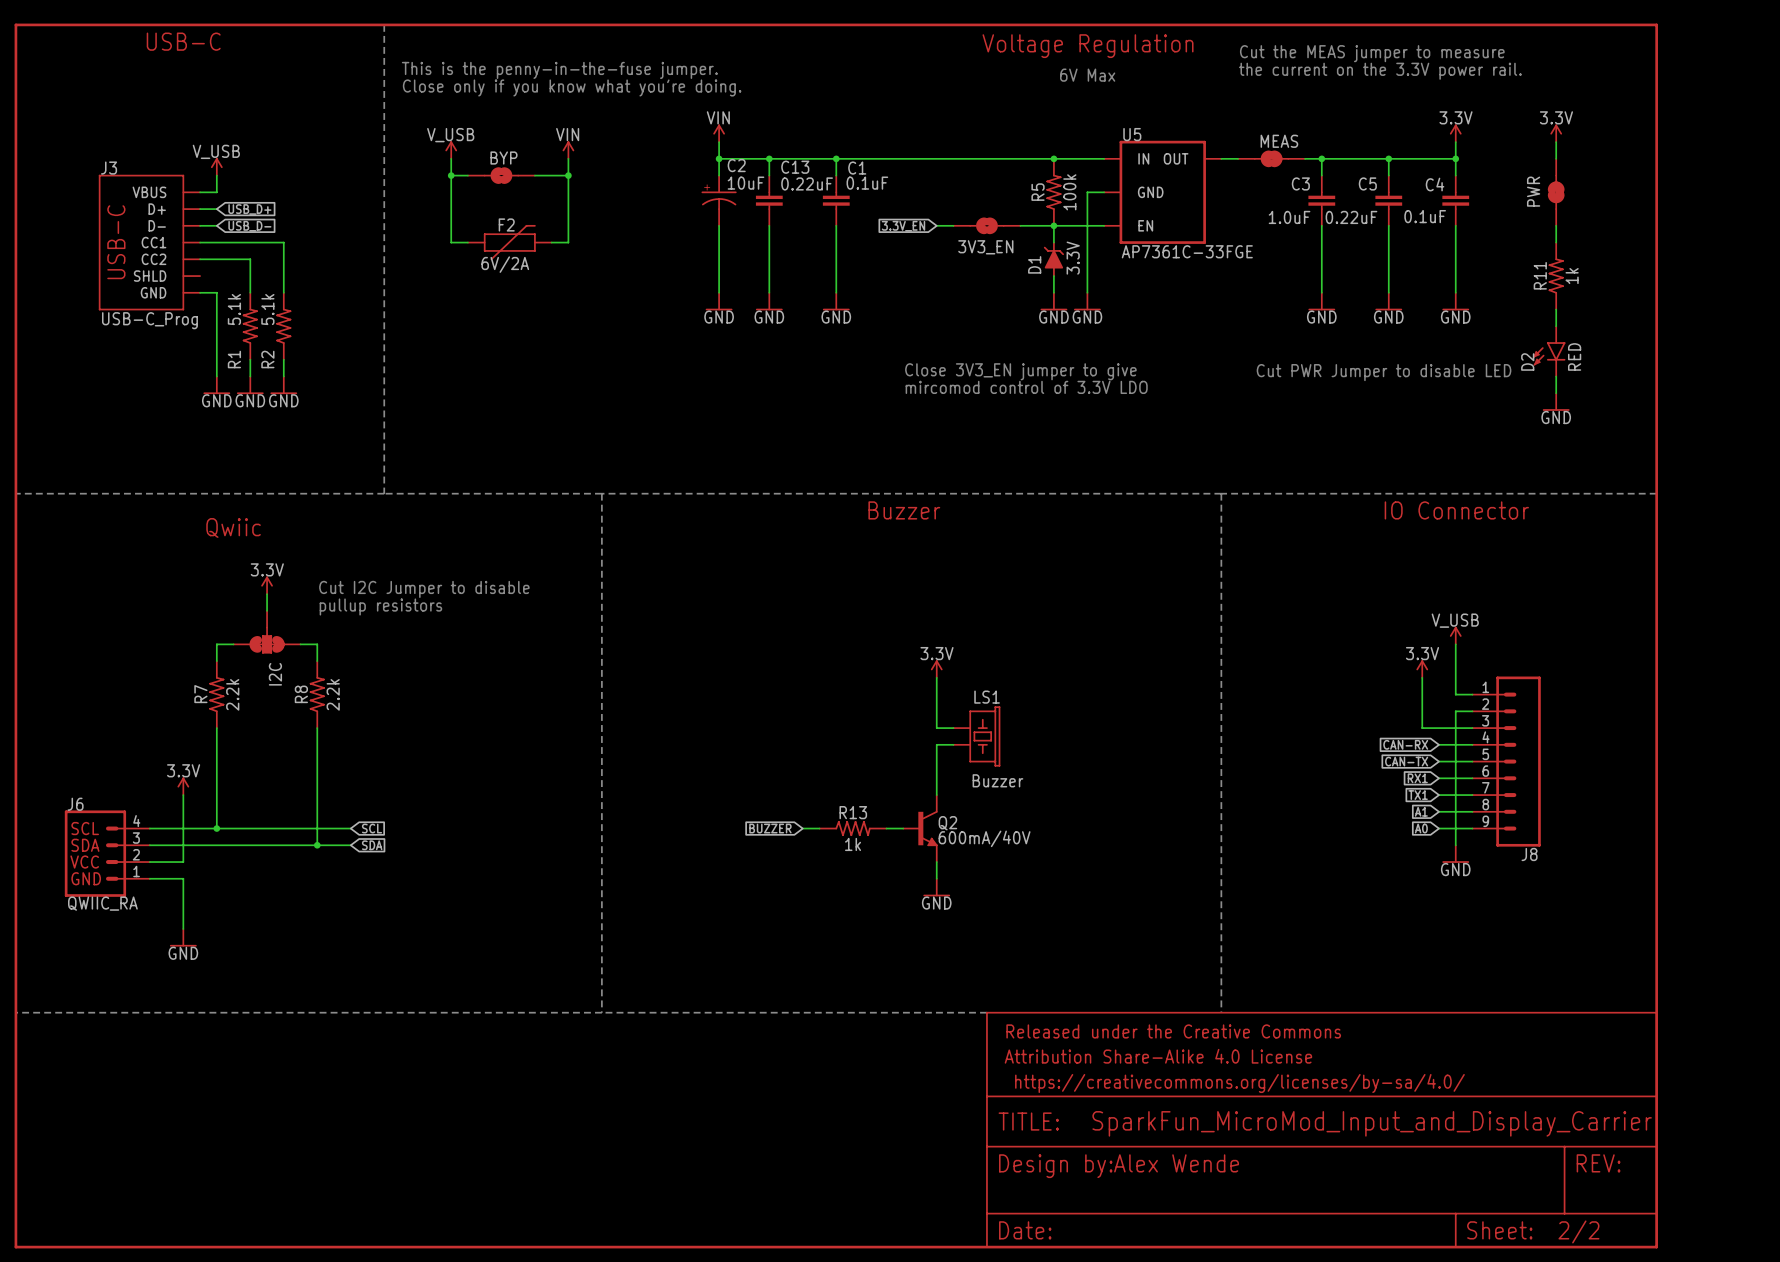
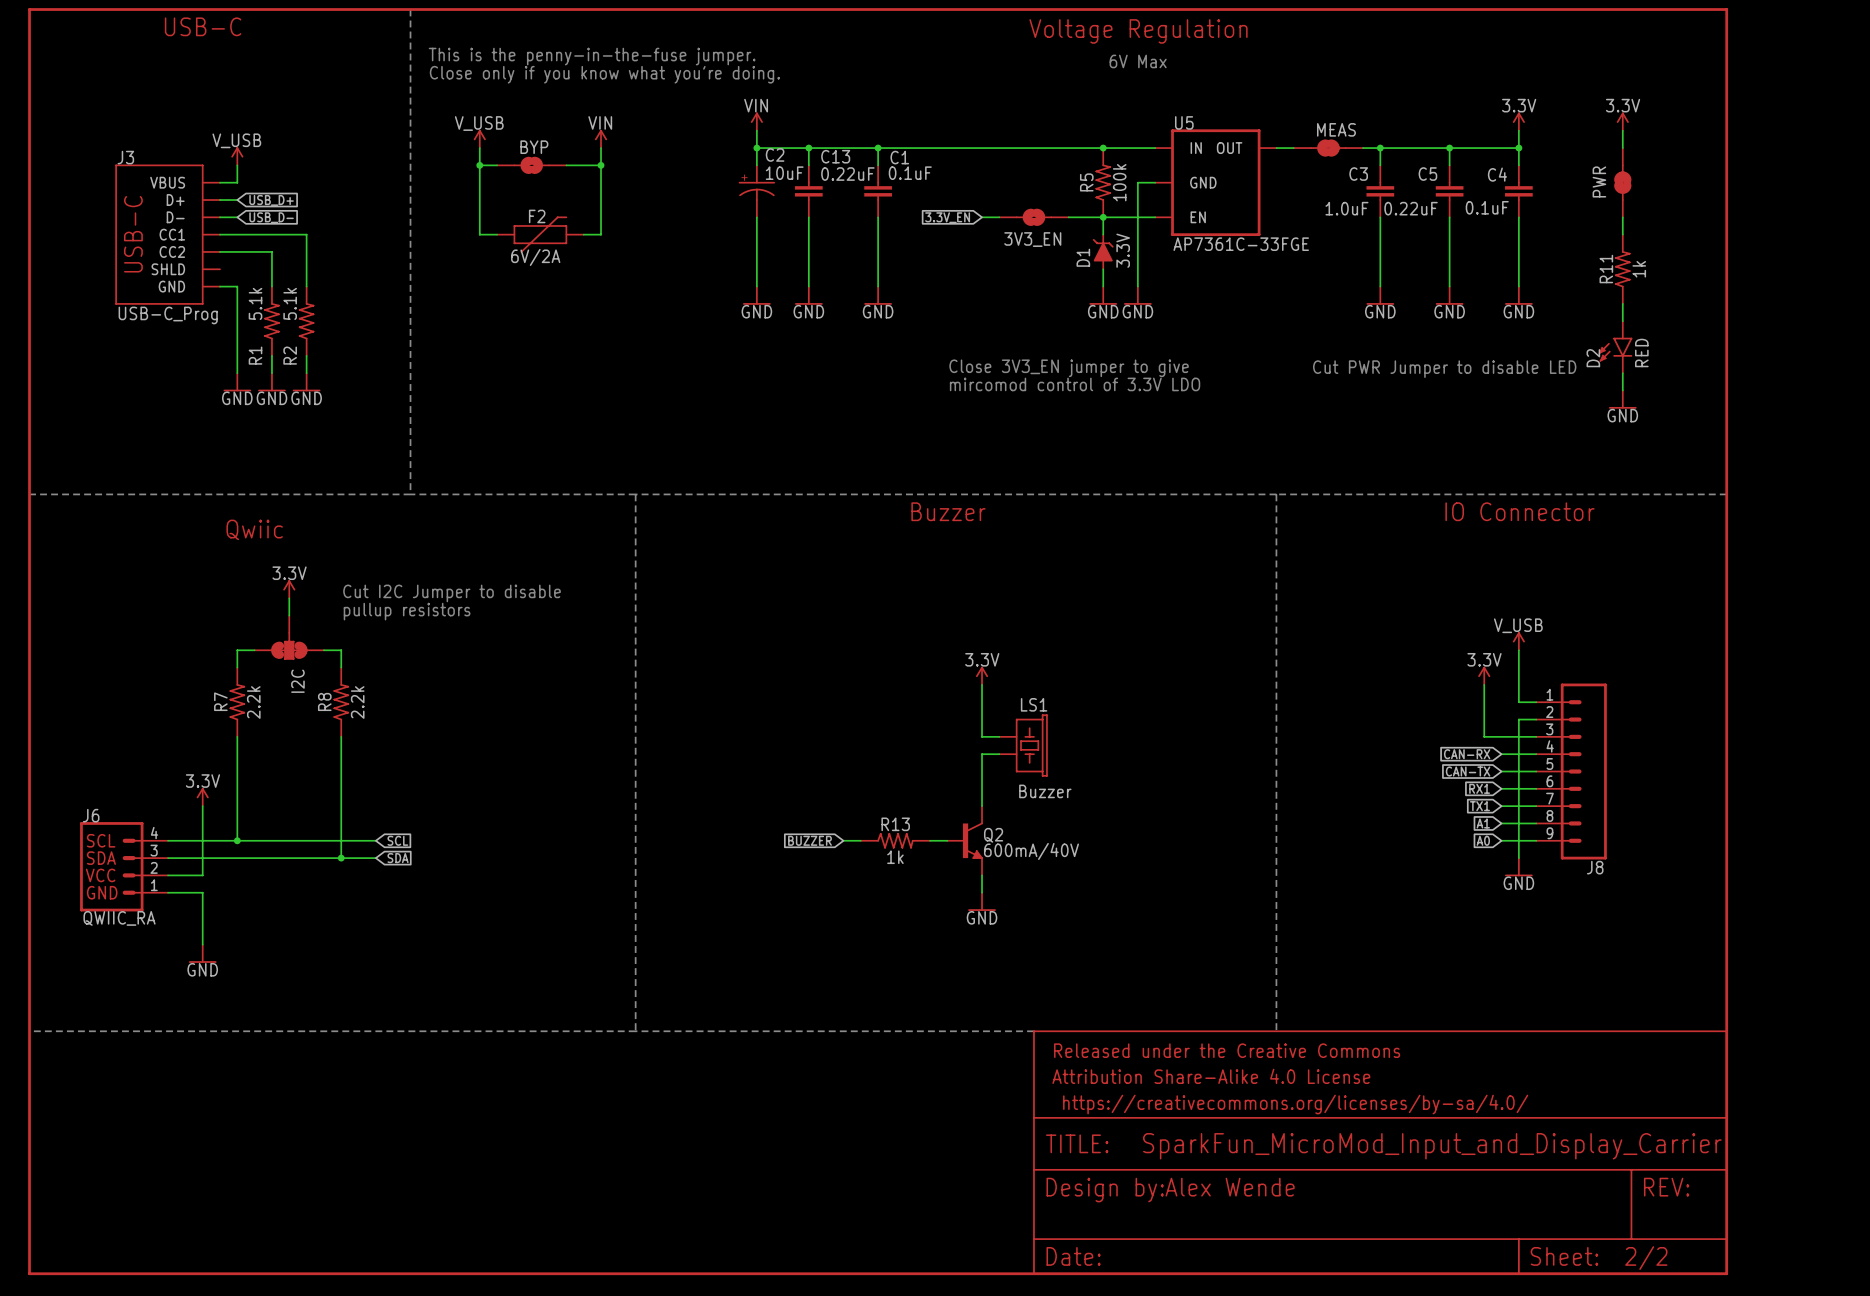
text: Cut the MEAS jumper to measure (1372, 53) -> none
text: the current on the 3.3V power rail. (1380, 71) -> none

